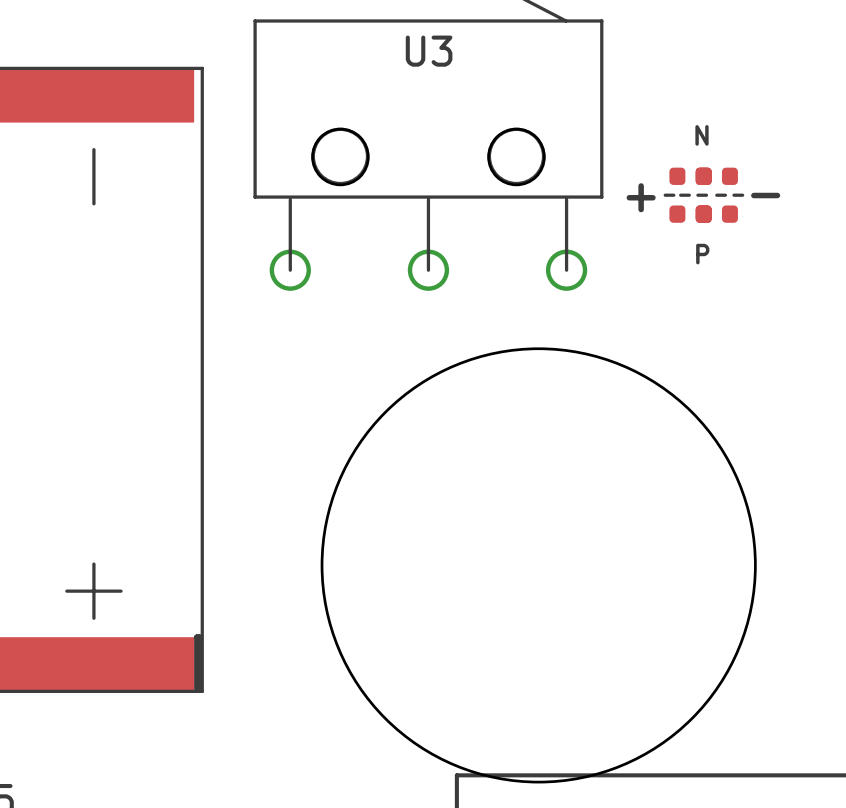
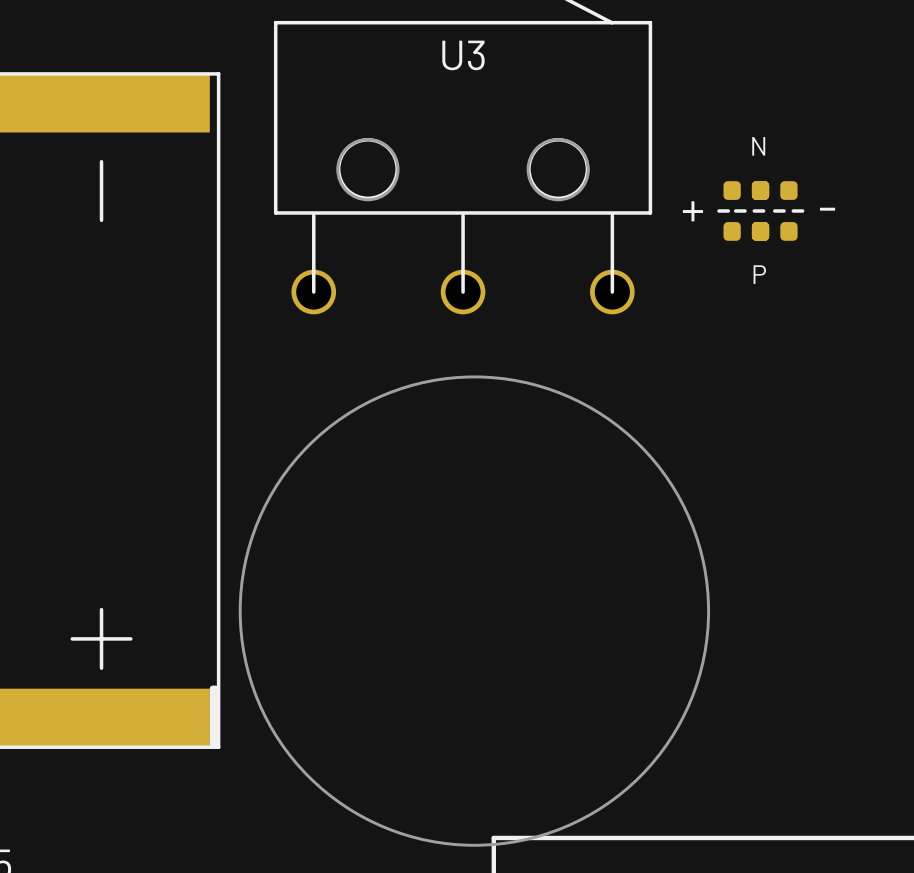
round board edge position: (538, 565) -> (474, 611)

